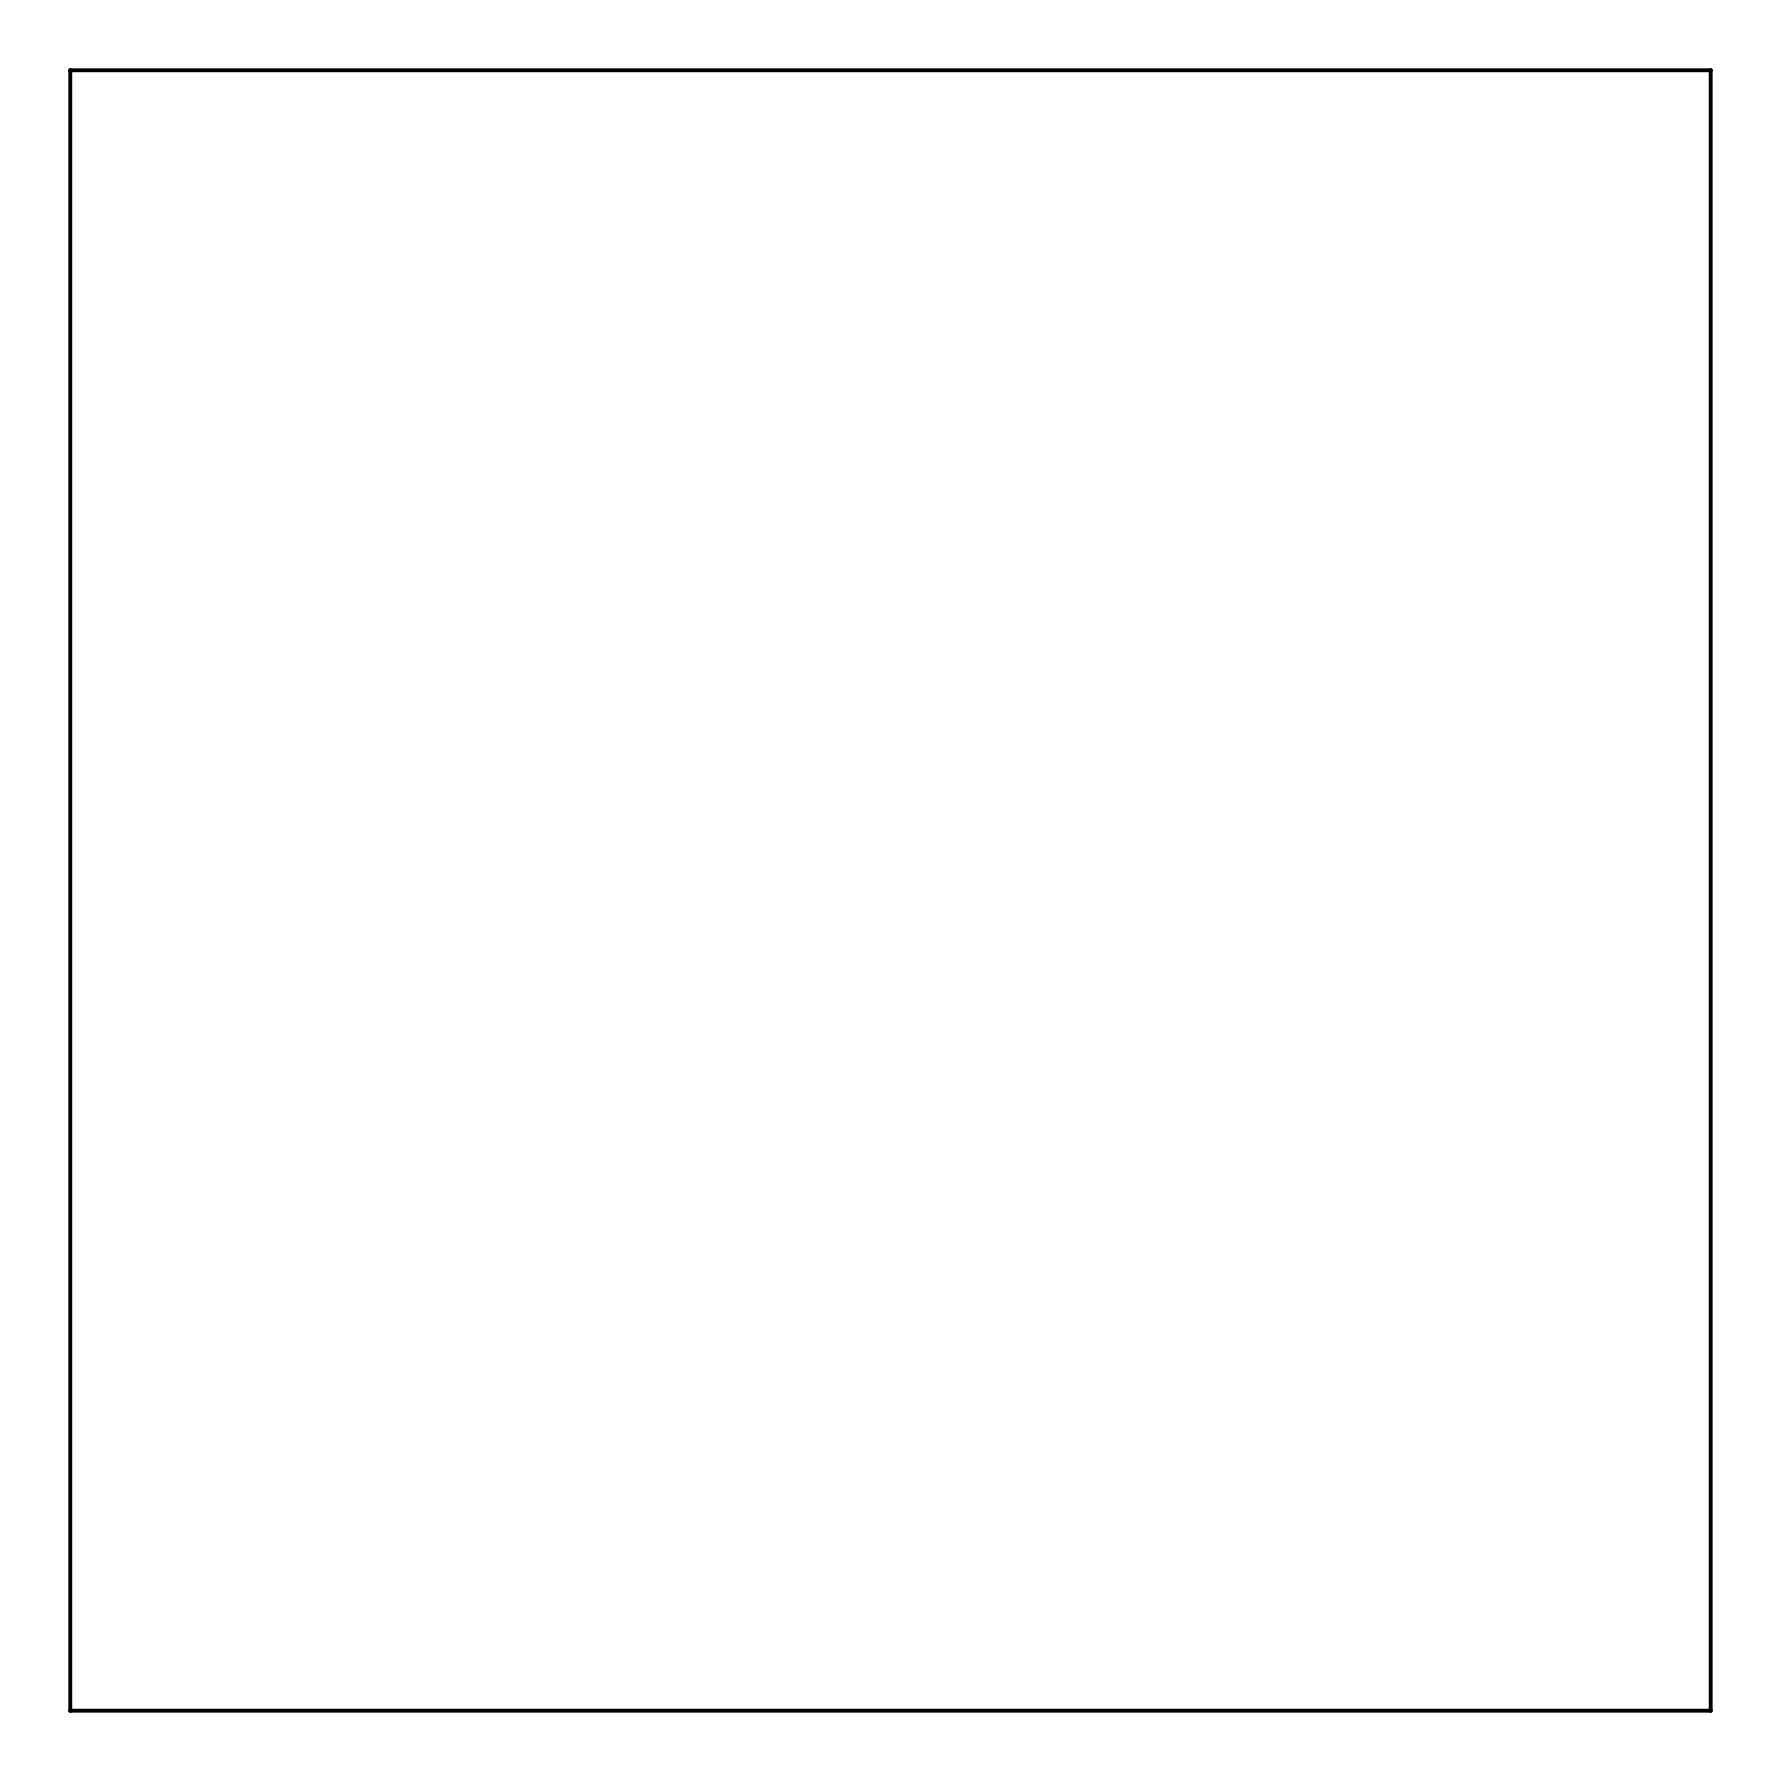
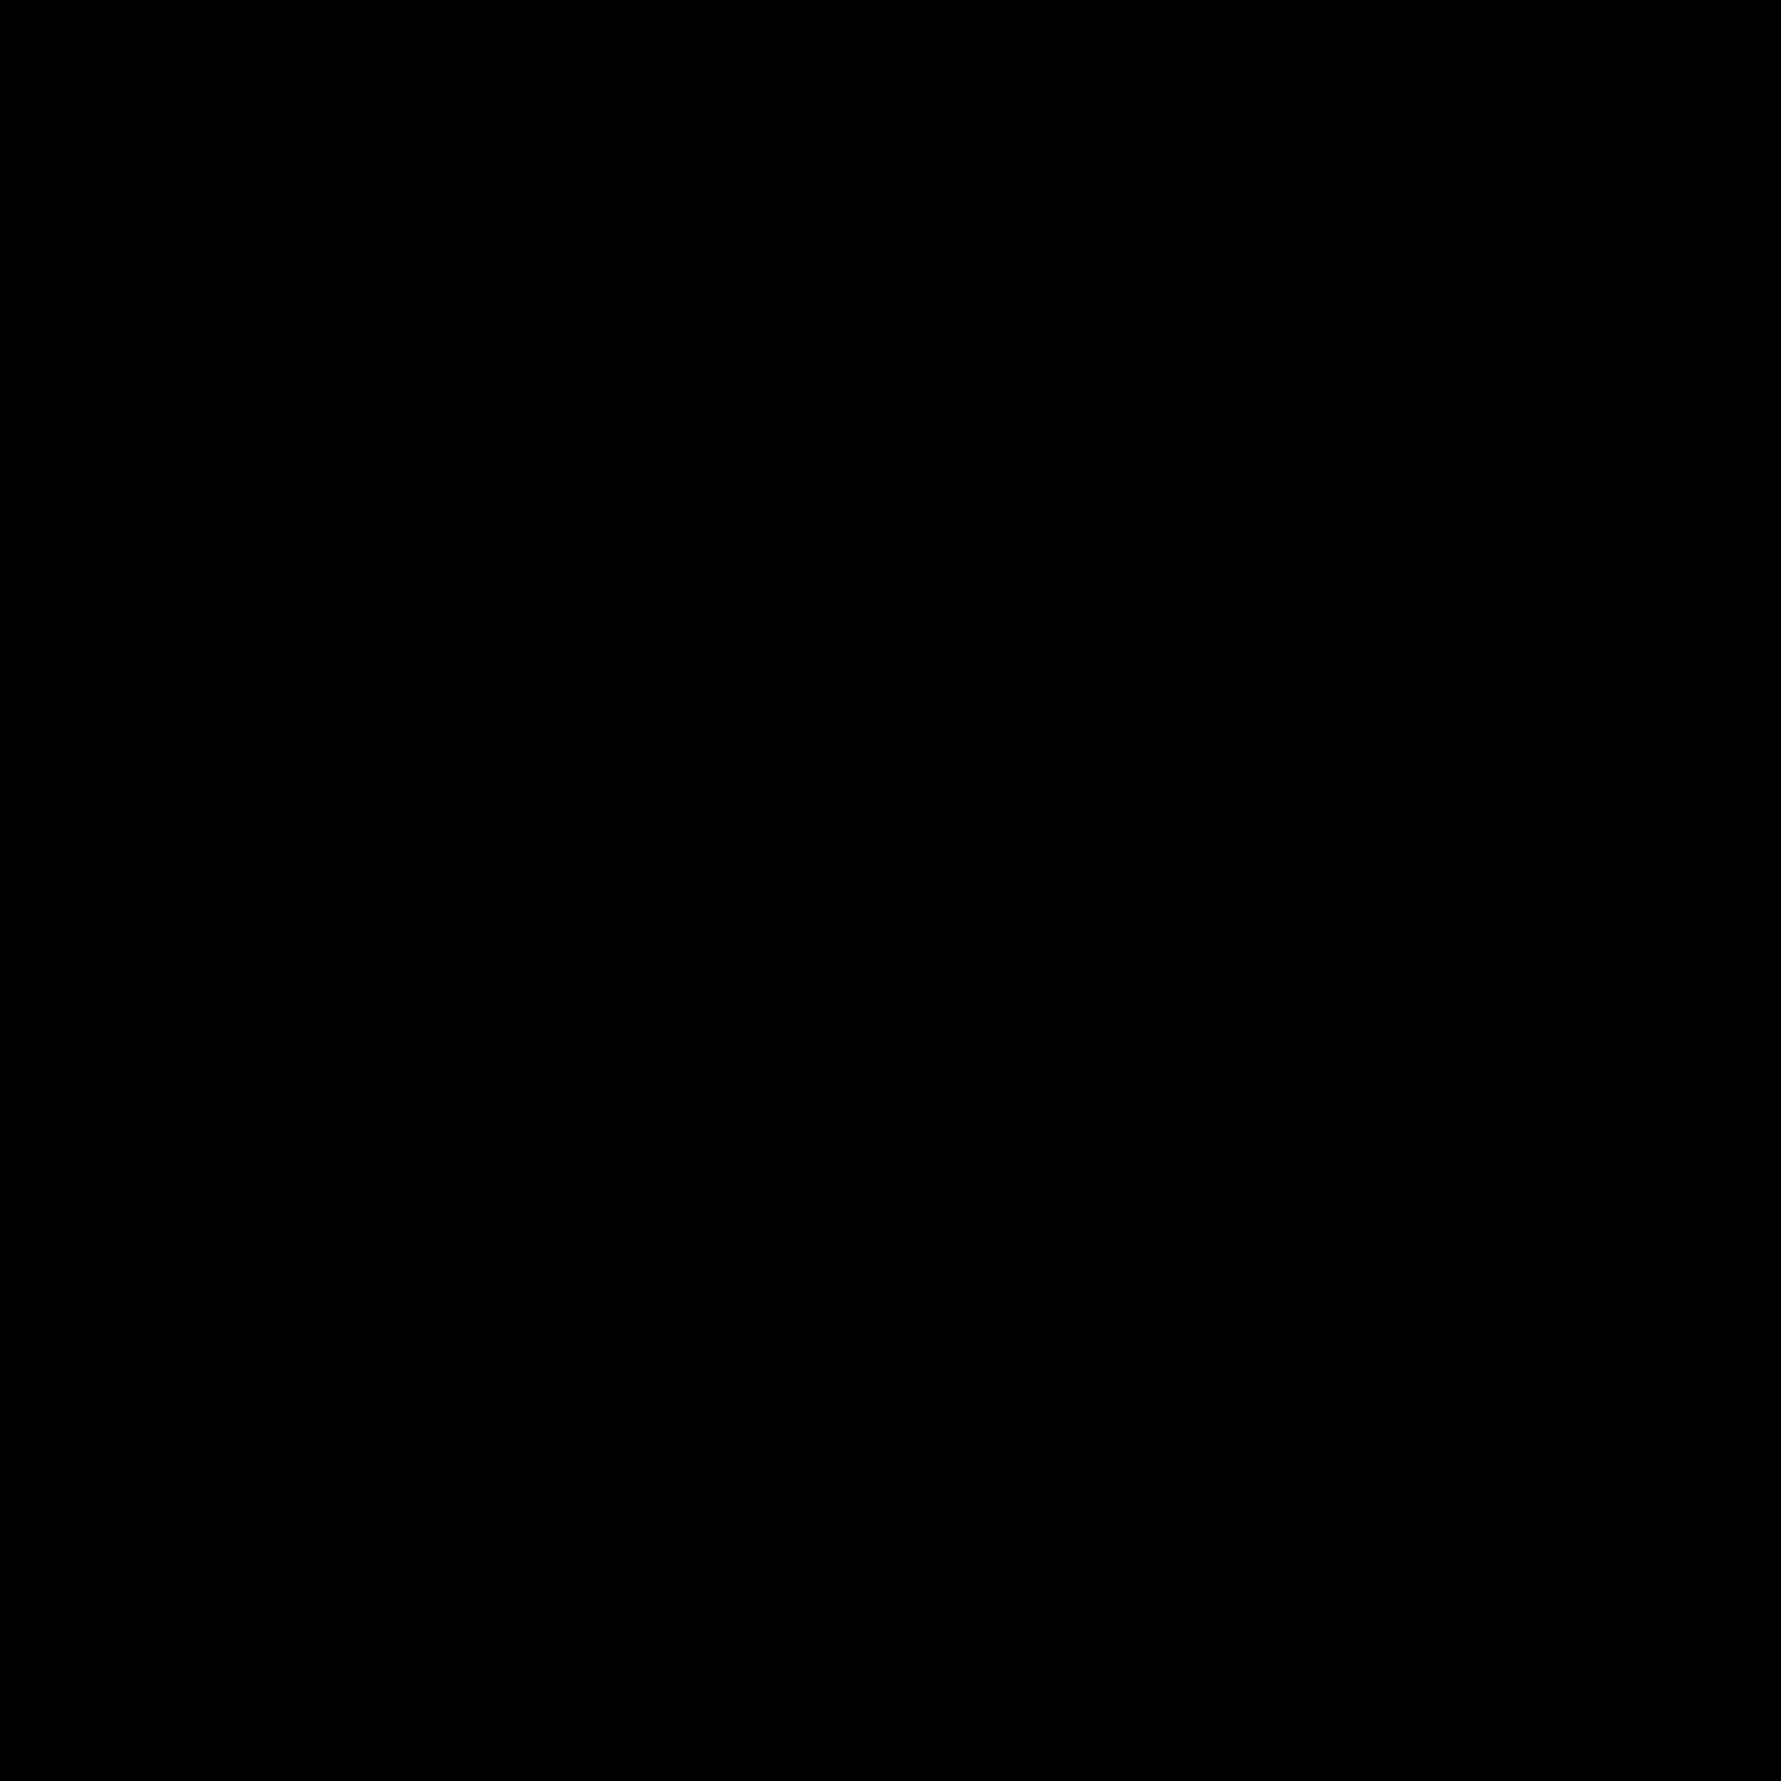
board edge: (1710, 70) (70, 70) (70, 1710) (1710, 1710) (1710, 70) -> none

